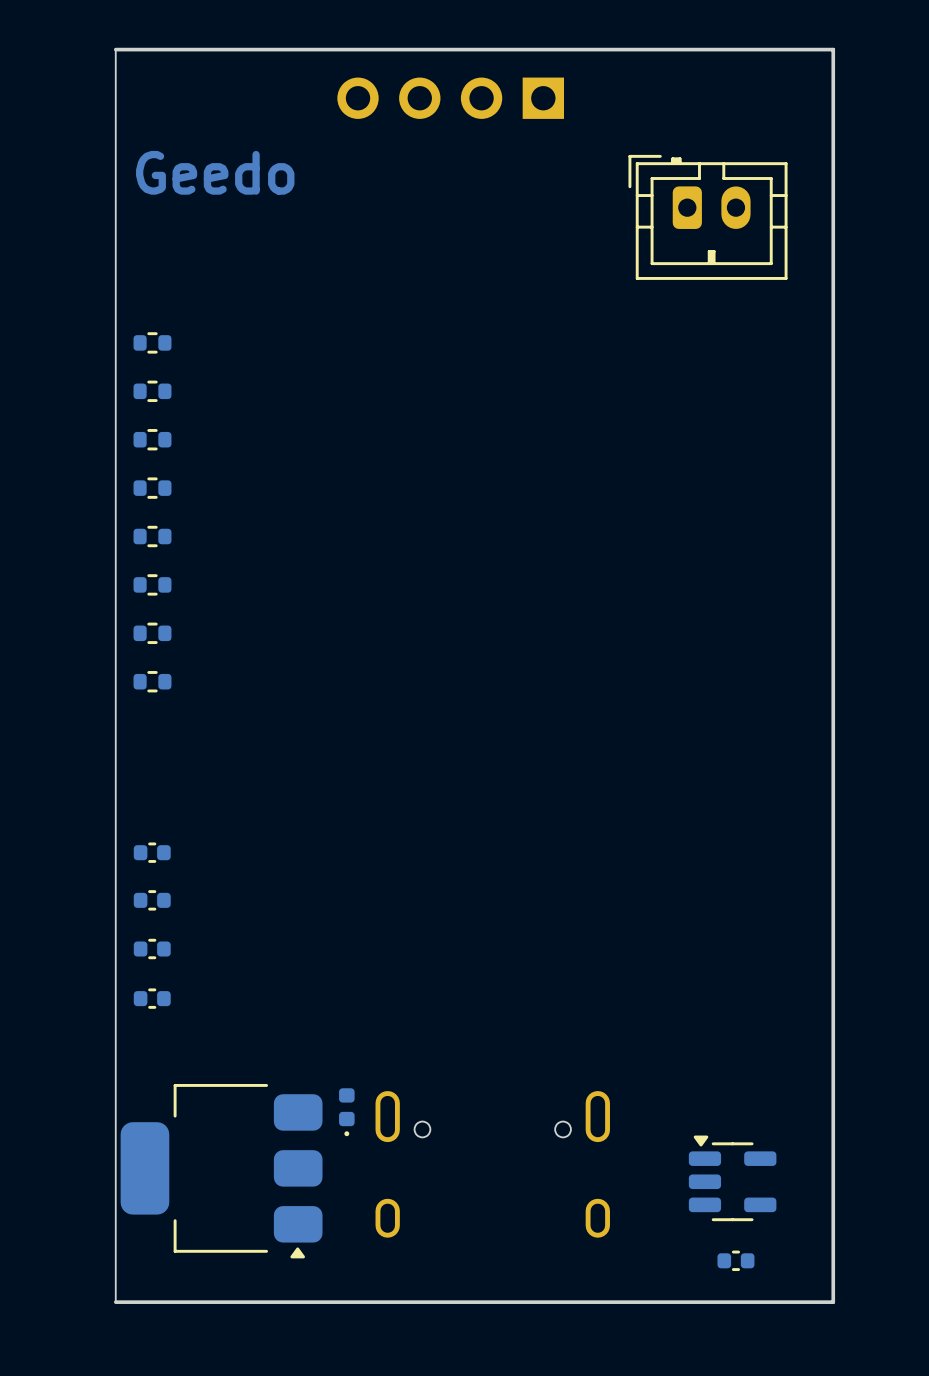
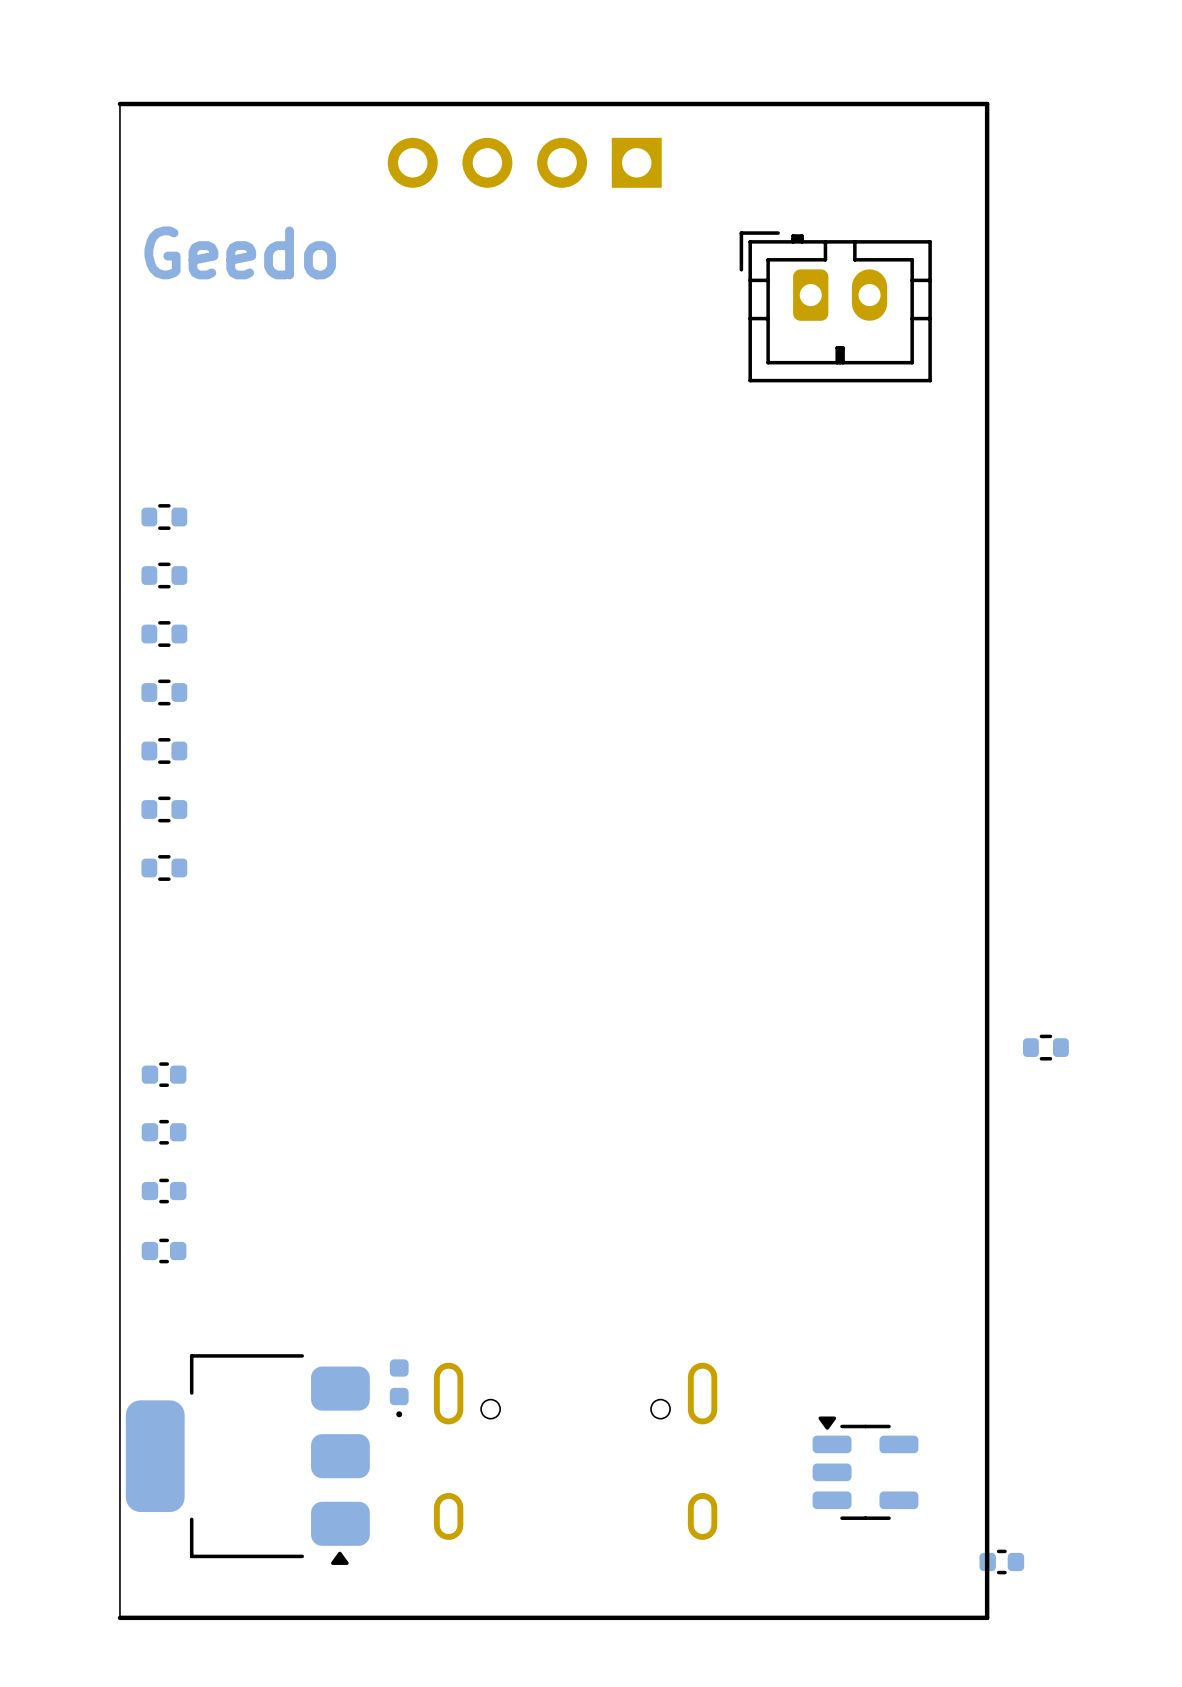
part: (152, 342) -> none
part: none -> (1045, 1047)
part position: (735, 1260) -> (1001, 1562)

